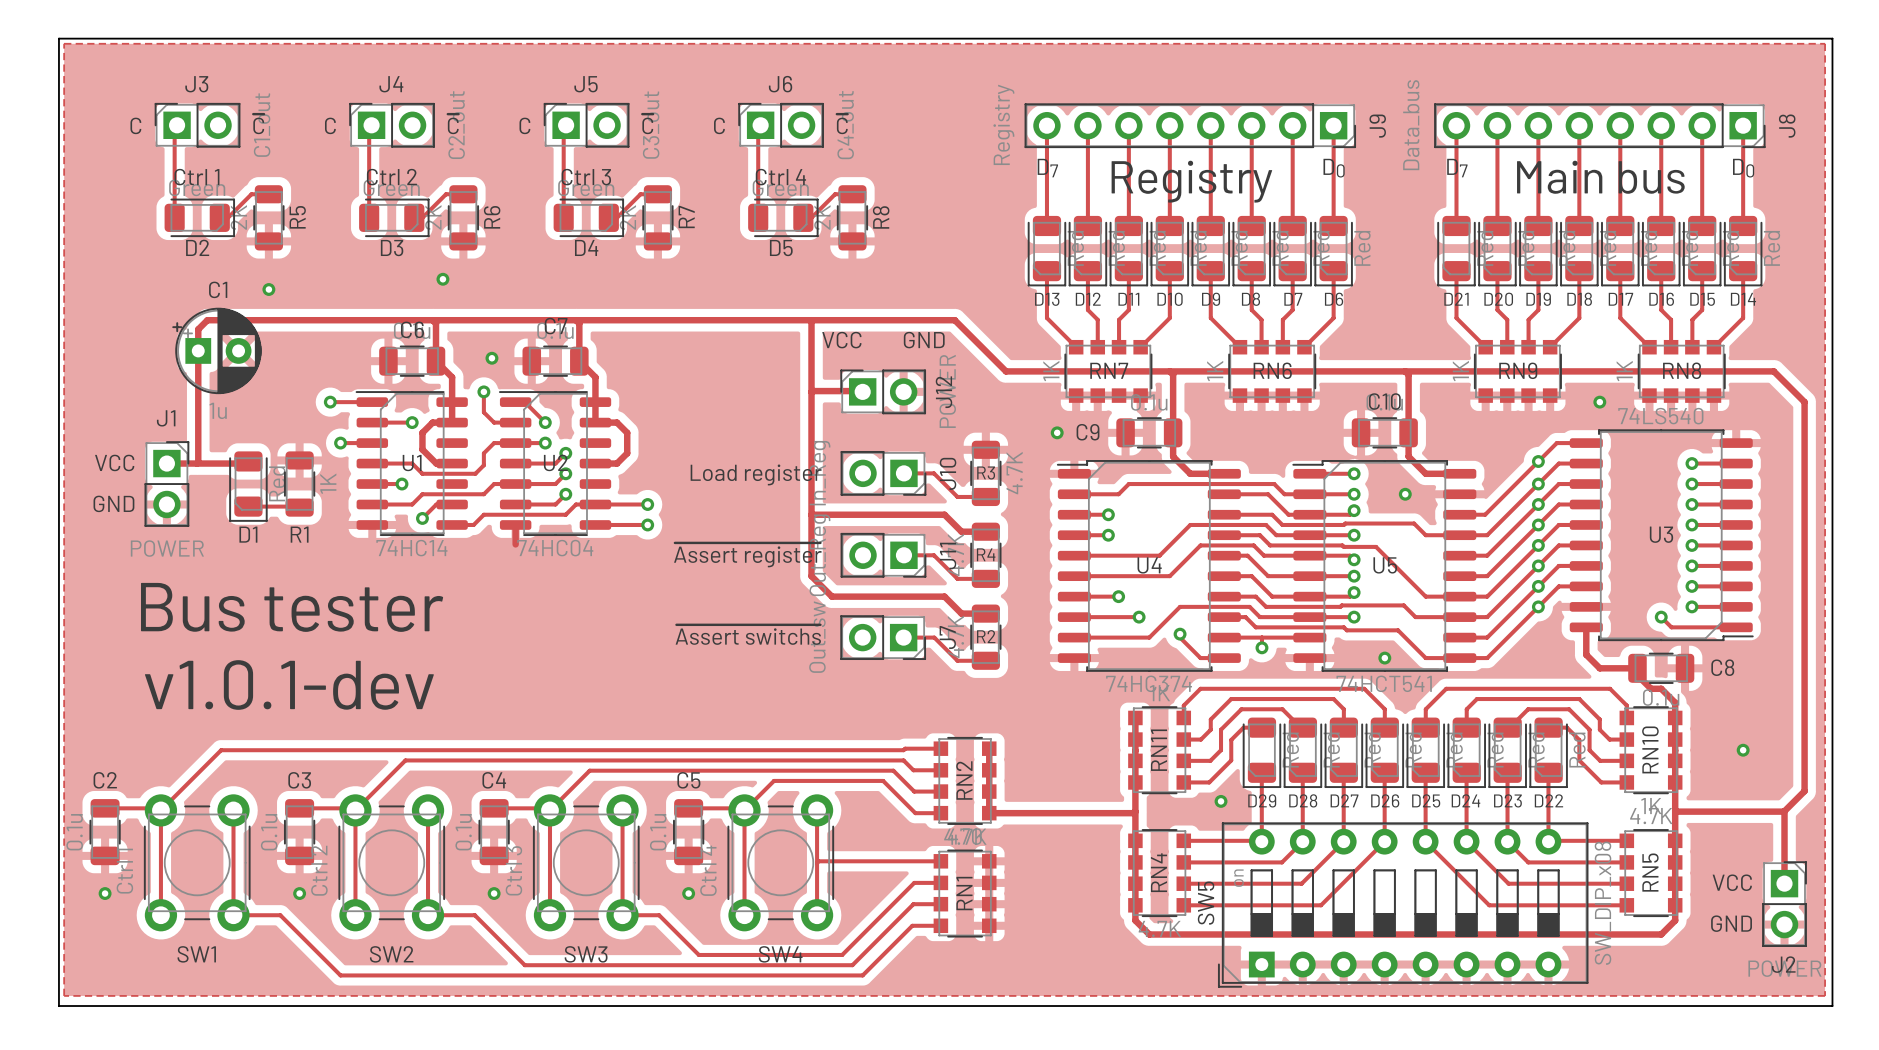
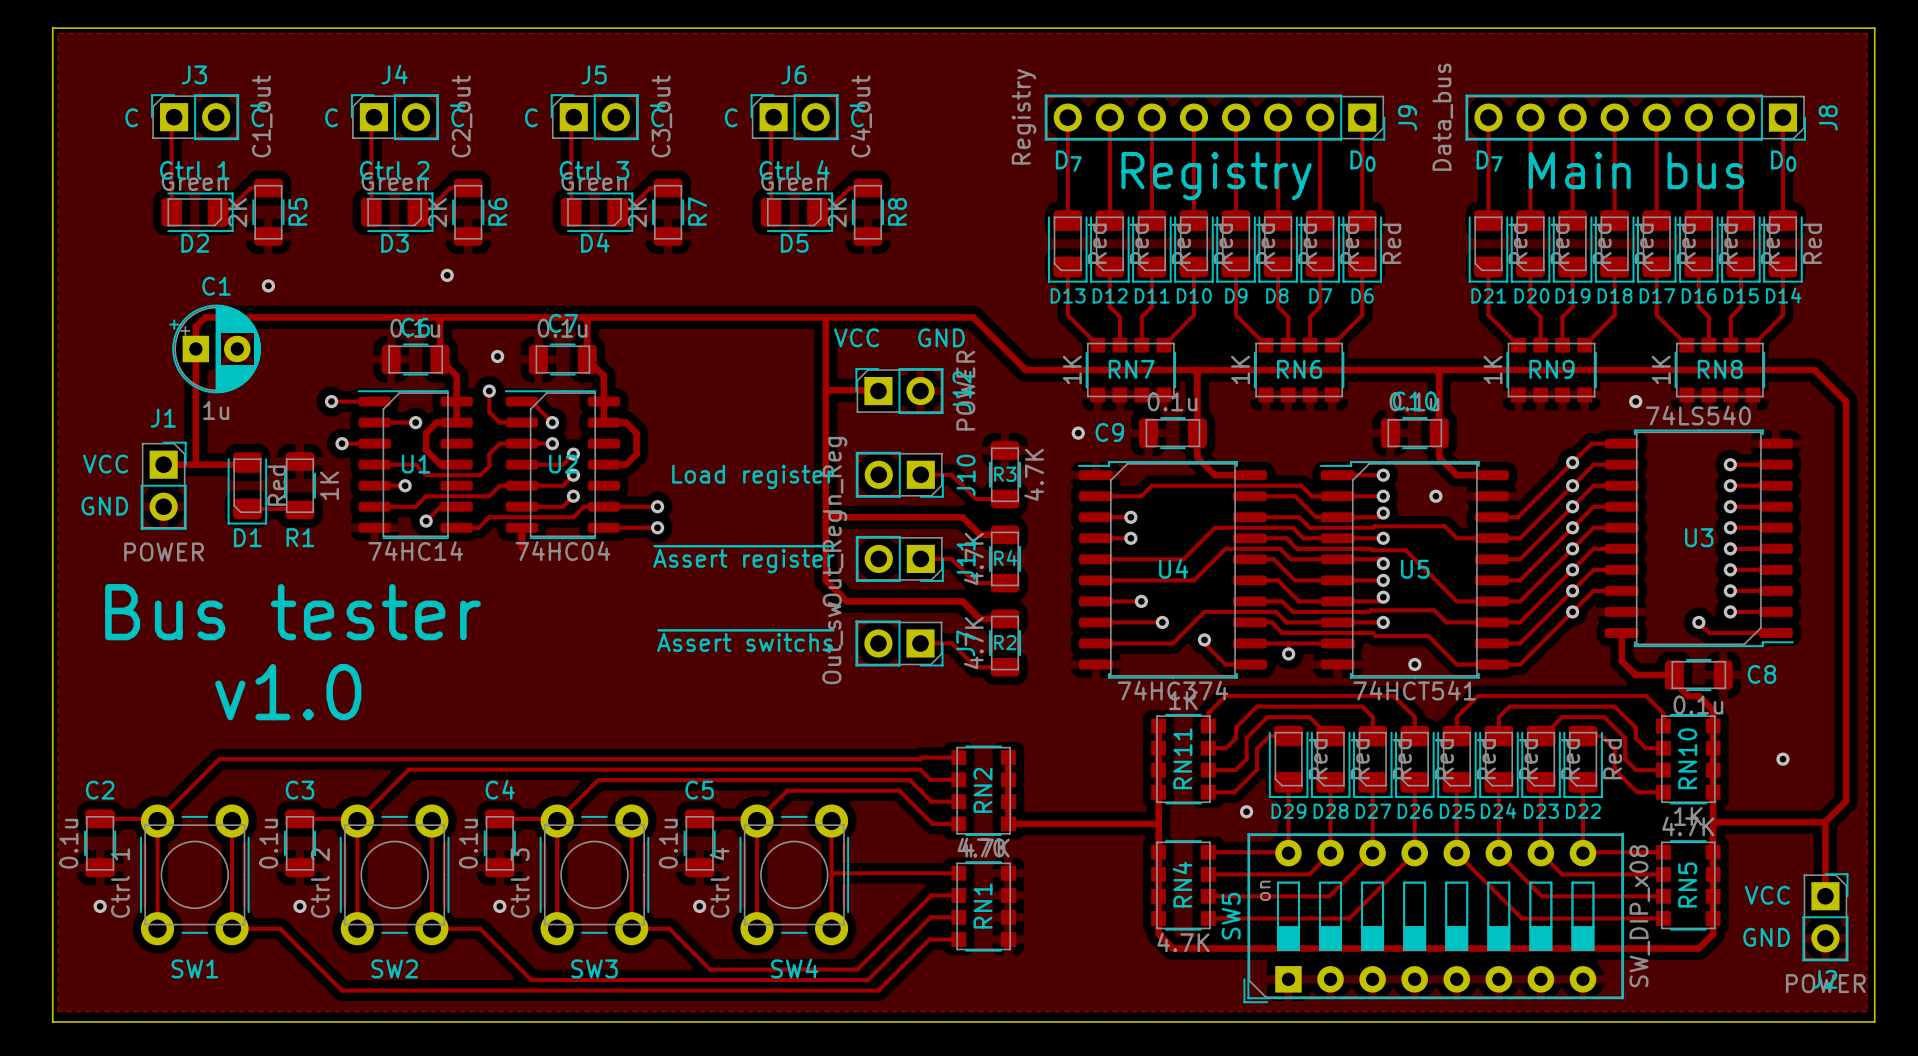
text: v1.0.1-dev (289, 684) -> v1.0 (288, 692)

